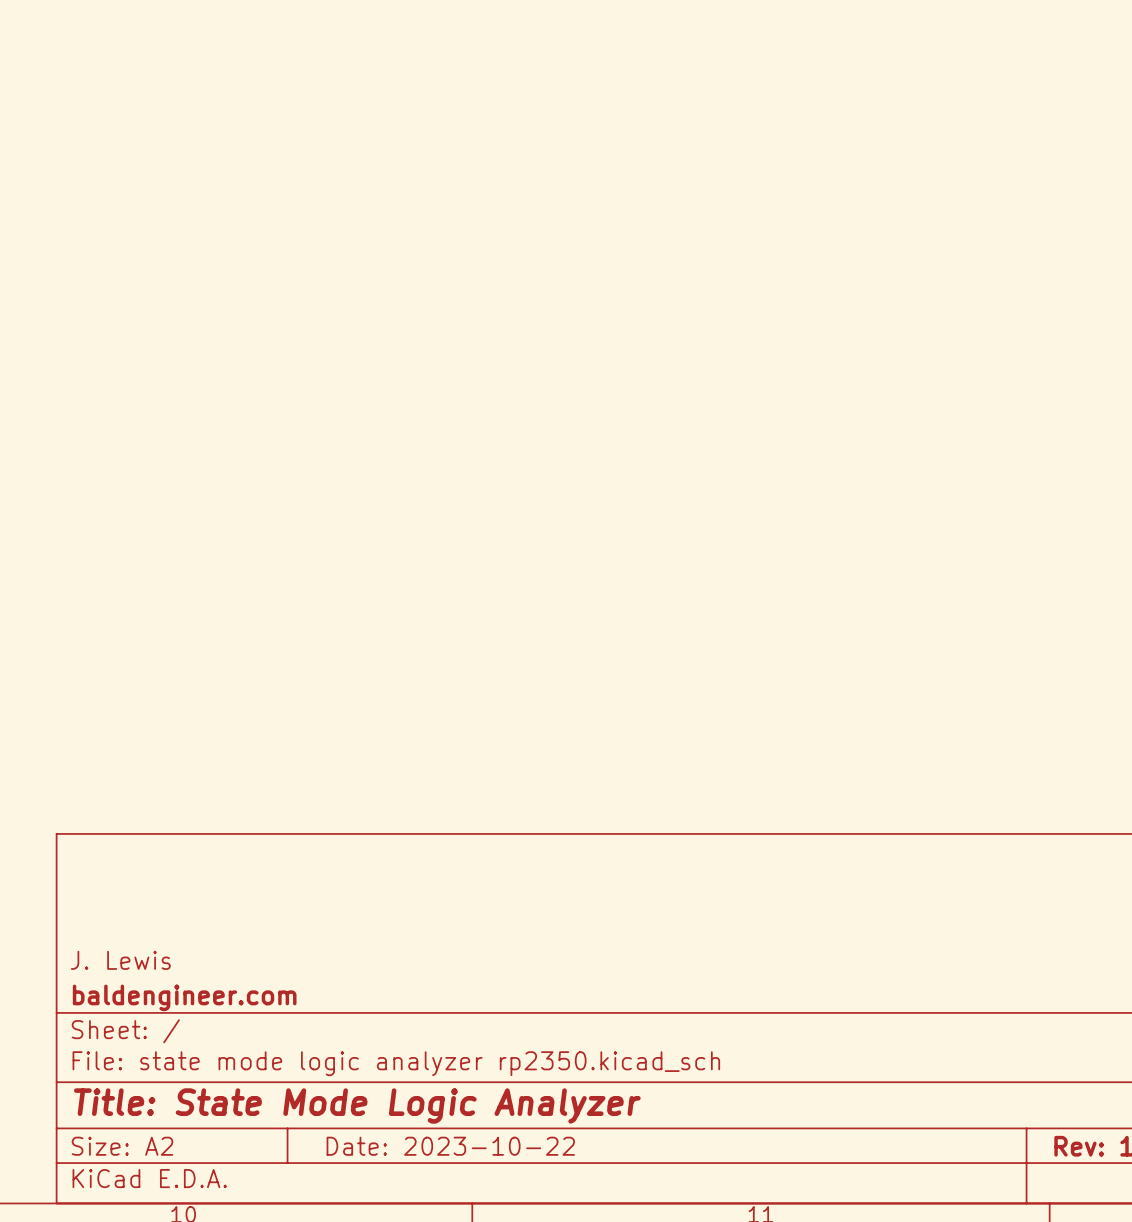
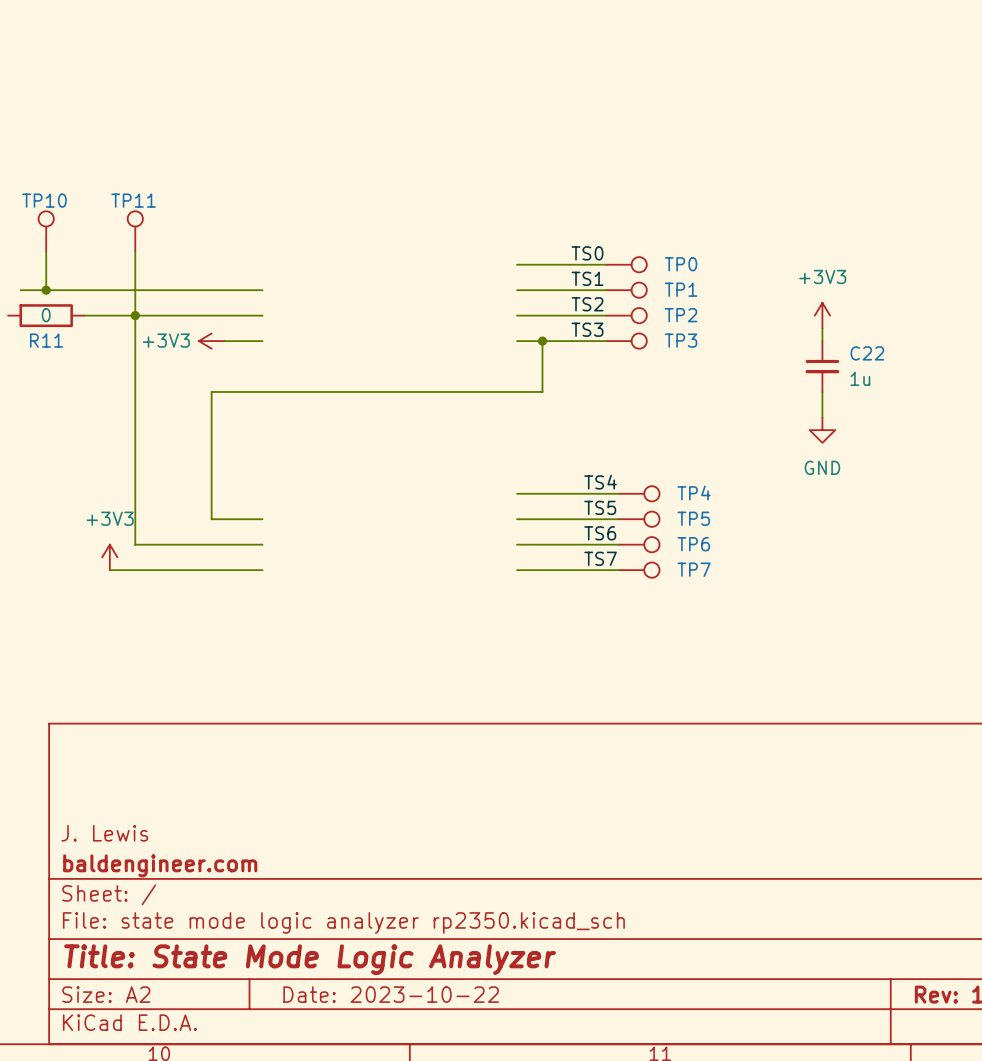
TP10: none -> (46, 231)
TP11: none -> (135, 231)
wire: none -> (46, 252) (46, 290)
wire: none -> (135, 252) (135, 544) (262, 544)
label: none -> TS0 (587, 253)
wire: none -> (517, 264) (606, 264)
TP0: none -> (626, 264)
label: none -> TS1 (587, 278)
wire: none -> (20, 290) (262, 290)
junction: none -> (46, 290)
wire: none -> (517, 290) (606, 290)
TP1: none -> (626, 290)
label: none -> TS2 (587, 304)
R11: none -> 0 (46, 315)
wire: none -> (84, 315) (262, 315)
junction: none -> (135, 315)
wire: none -> (517, 315) (606, 315)
TP2: none -> (626, 315)
power symbol: none -> +3V3 (822, 315)
wire: none -> (822, 328) (822, 341)
label: none -> TS3 (587, 329)
power symbol: none -> +3V3 (211, 341)
wire: none -> (224, 341) (262, 341)
wire: none -> (517, 341) (606, 341)
wire: none -> (542, 341) (542, 391) (211, 391) (211, 519) (262, 519)
junction: none -> (542, 341)
TP3: none -> (626, 341)
C22: none -> 1u (822, 366)
wire: none -> (822, 391) (822, 417)
power symbol: none -> GND (822, 430)
label: none -> TS4 (600, 482)
wire: none -> (517, 493) (618, 493)
TP4: none -> (639, 493)
label: none -> TS5 (600, 507)
wire: none -> (517, 519) (618, 519)
TP5: none -> (639, 519)
label: none -> TS6 (600, 533)
wire: none -> (517, 544) (618, 544)
TP6: none -> (639, 544)
power symbol: none -> +3V3 (109, 557)
label: none -> TS7 (600, 558)
wire: none -> (109, 570) (262, 570)
wire: none -> (517, 570) (618, 570)
TP7: none -> (639, 570)

